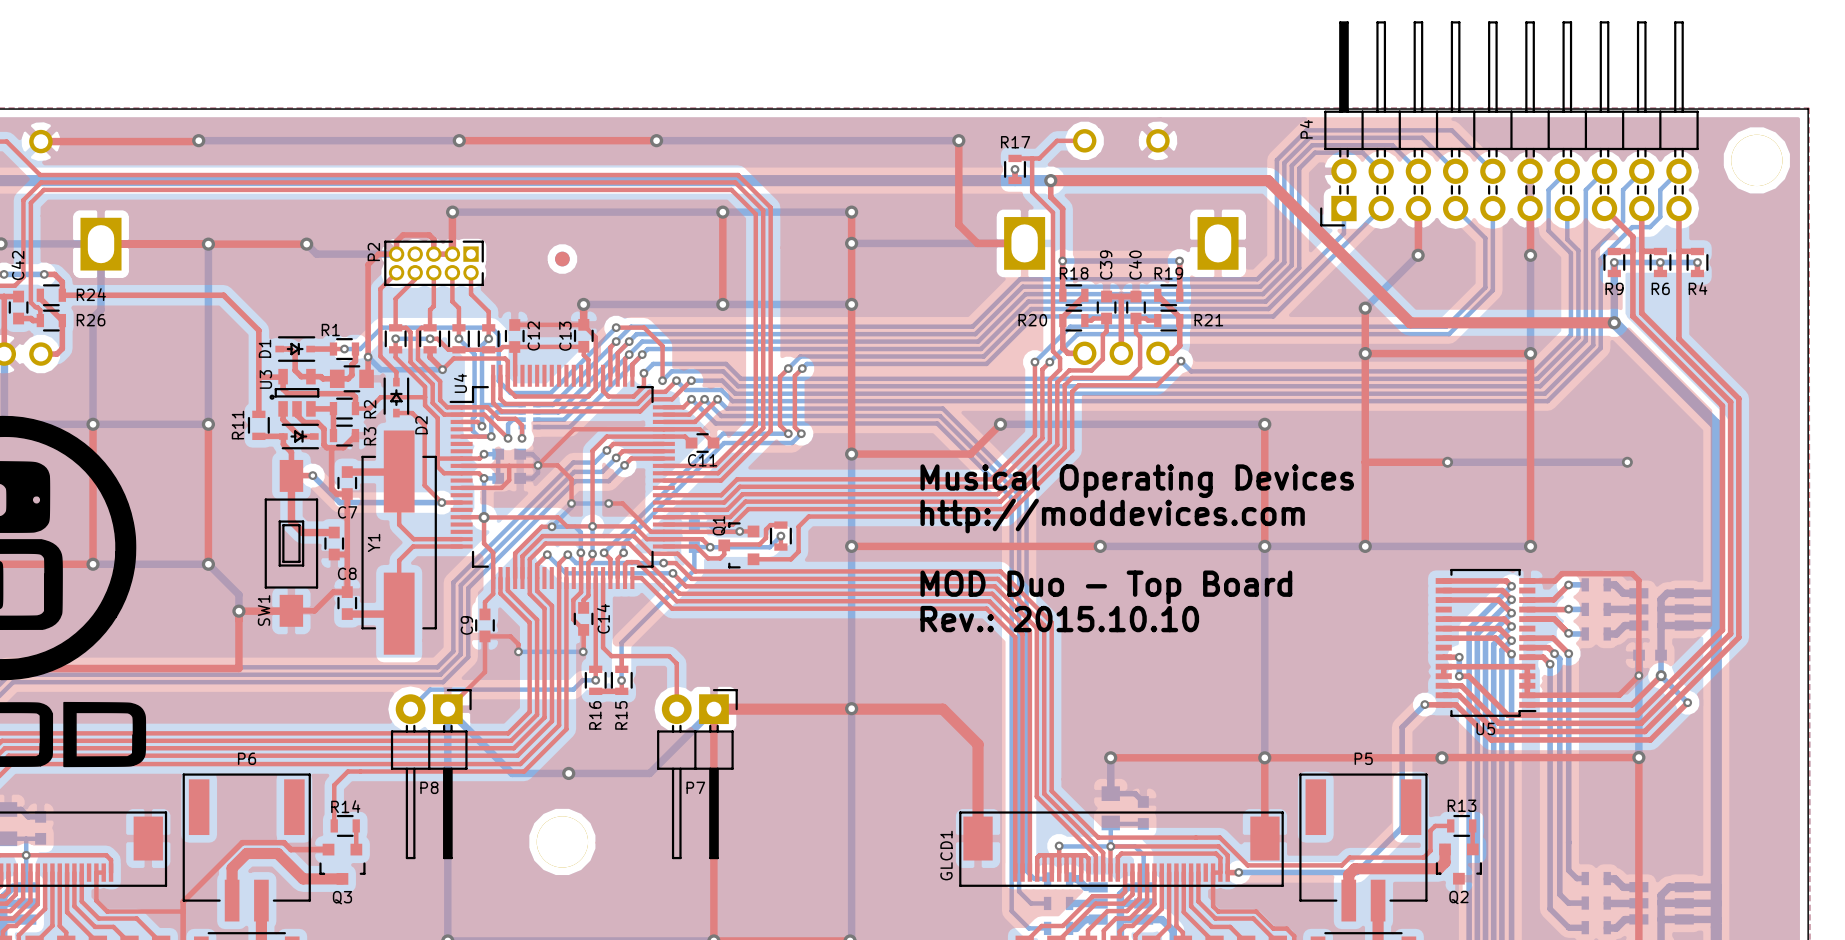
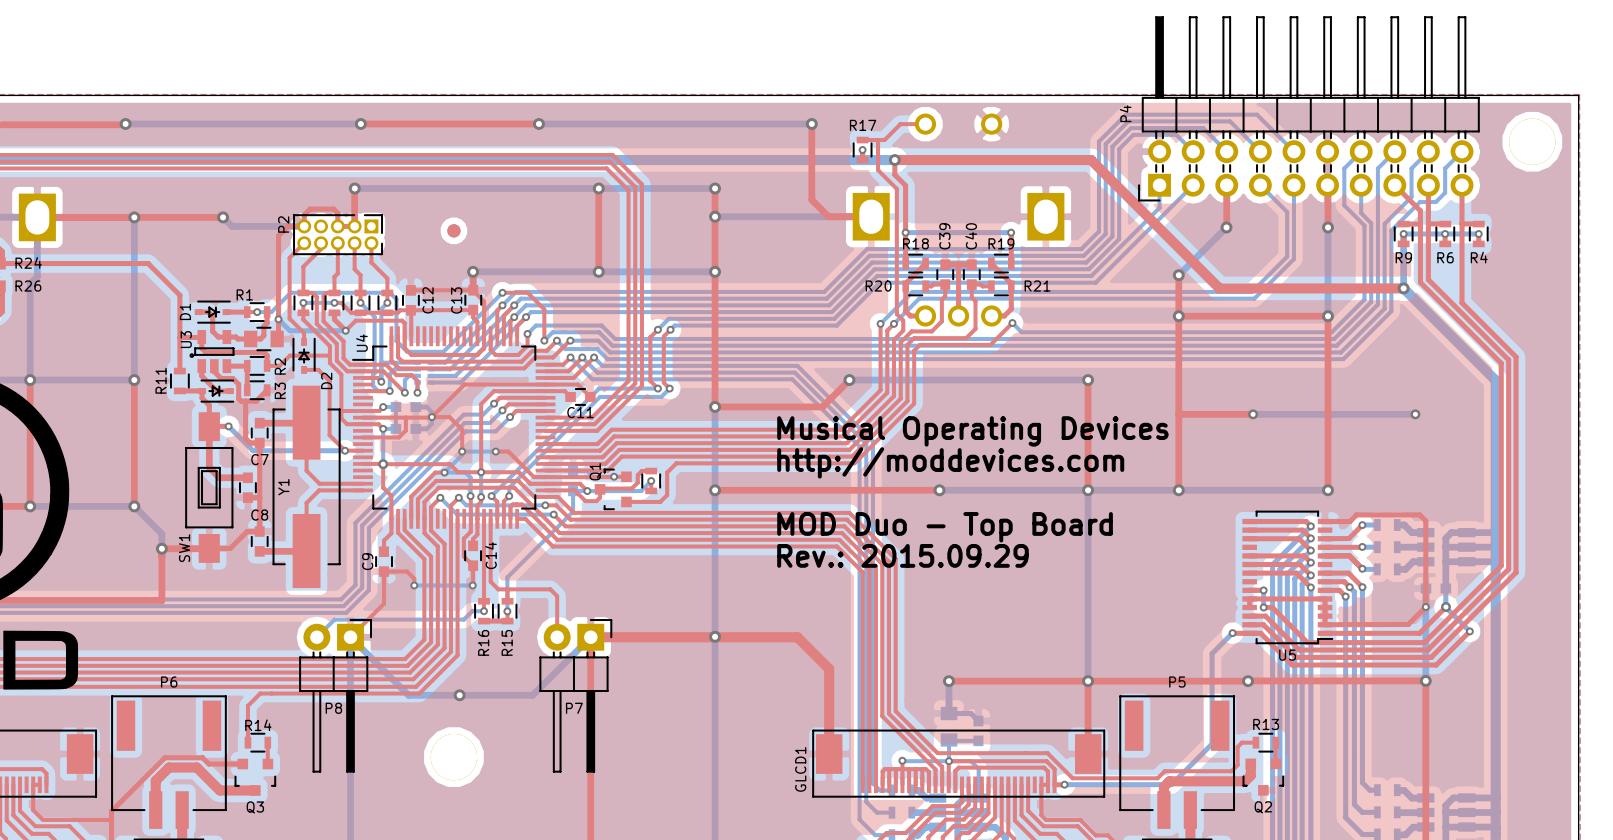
text: Rev.: 2015.10.10 (1059, 619) -> Rev.: 2015.09.29 (902, 555)

